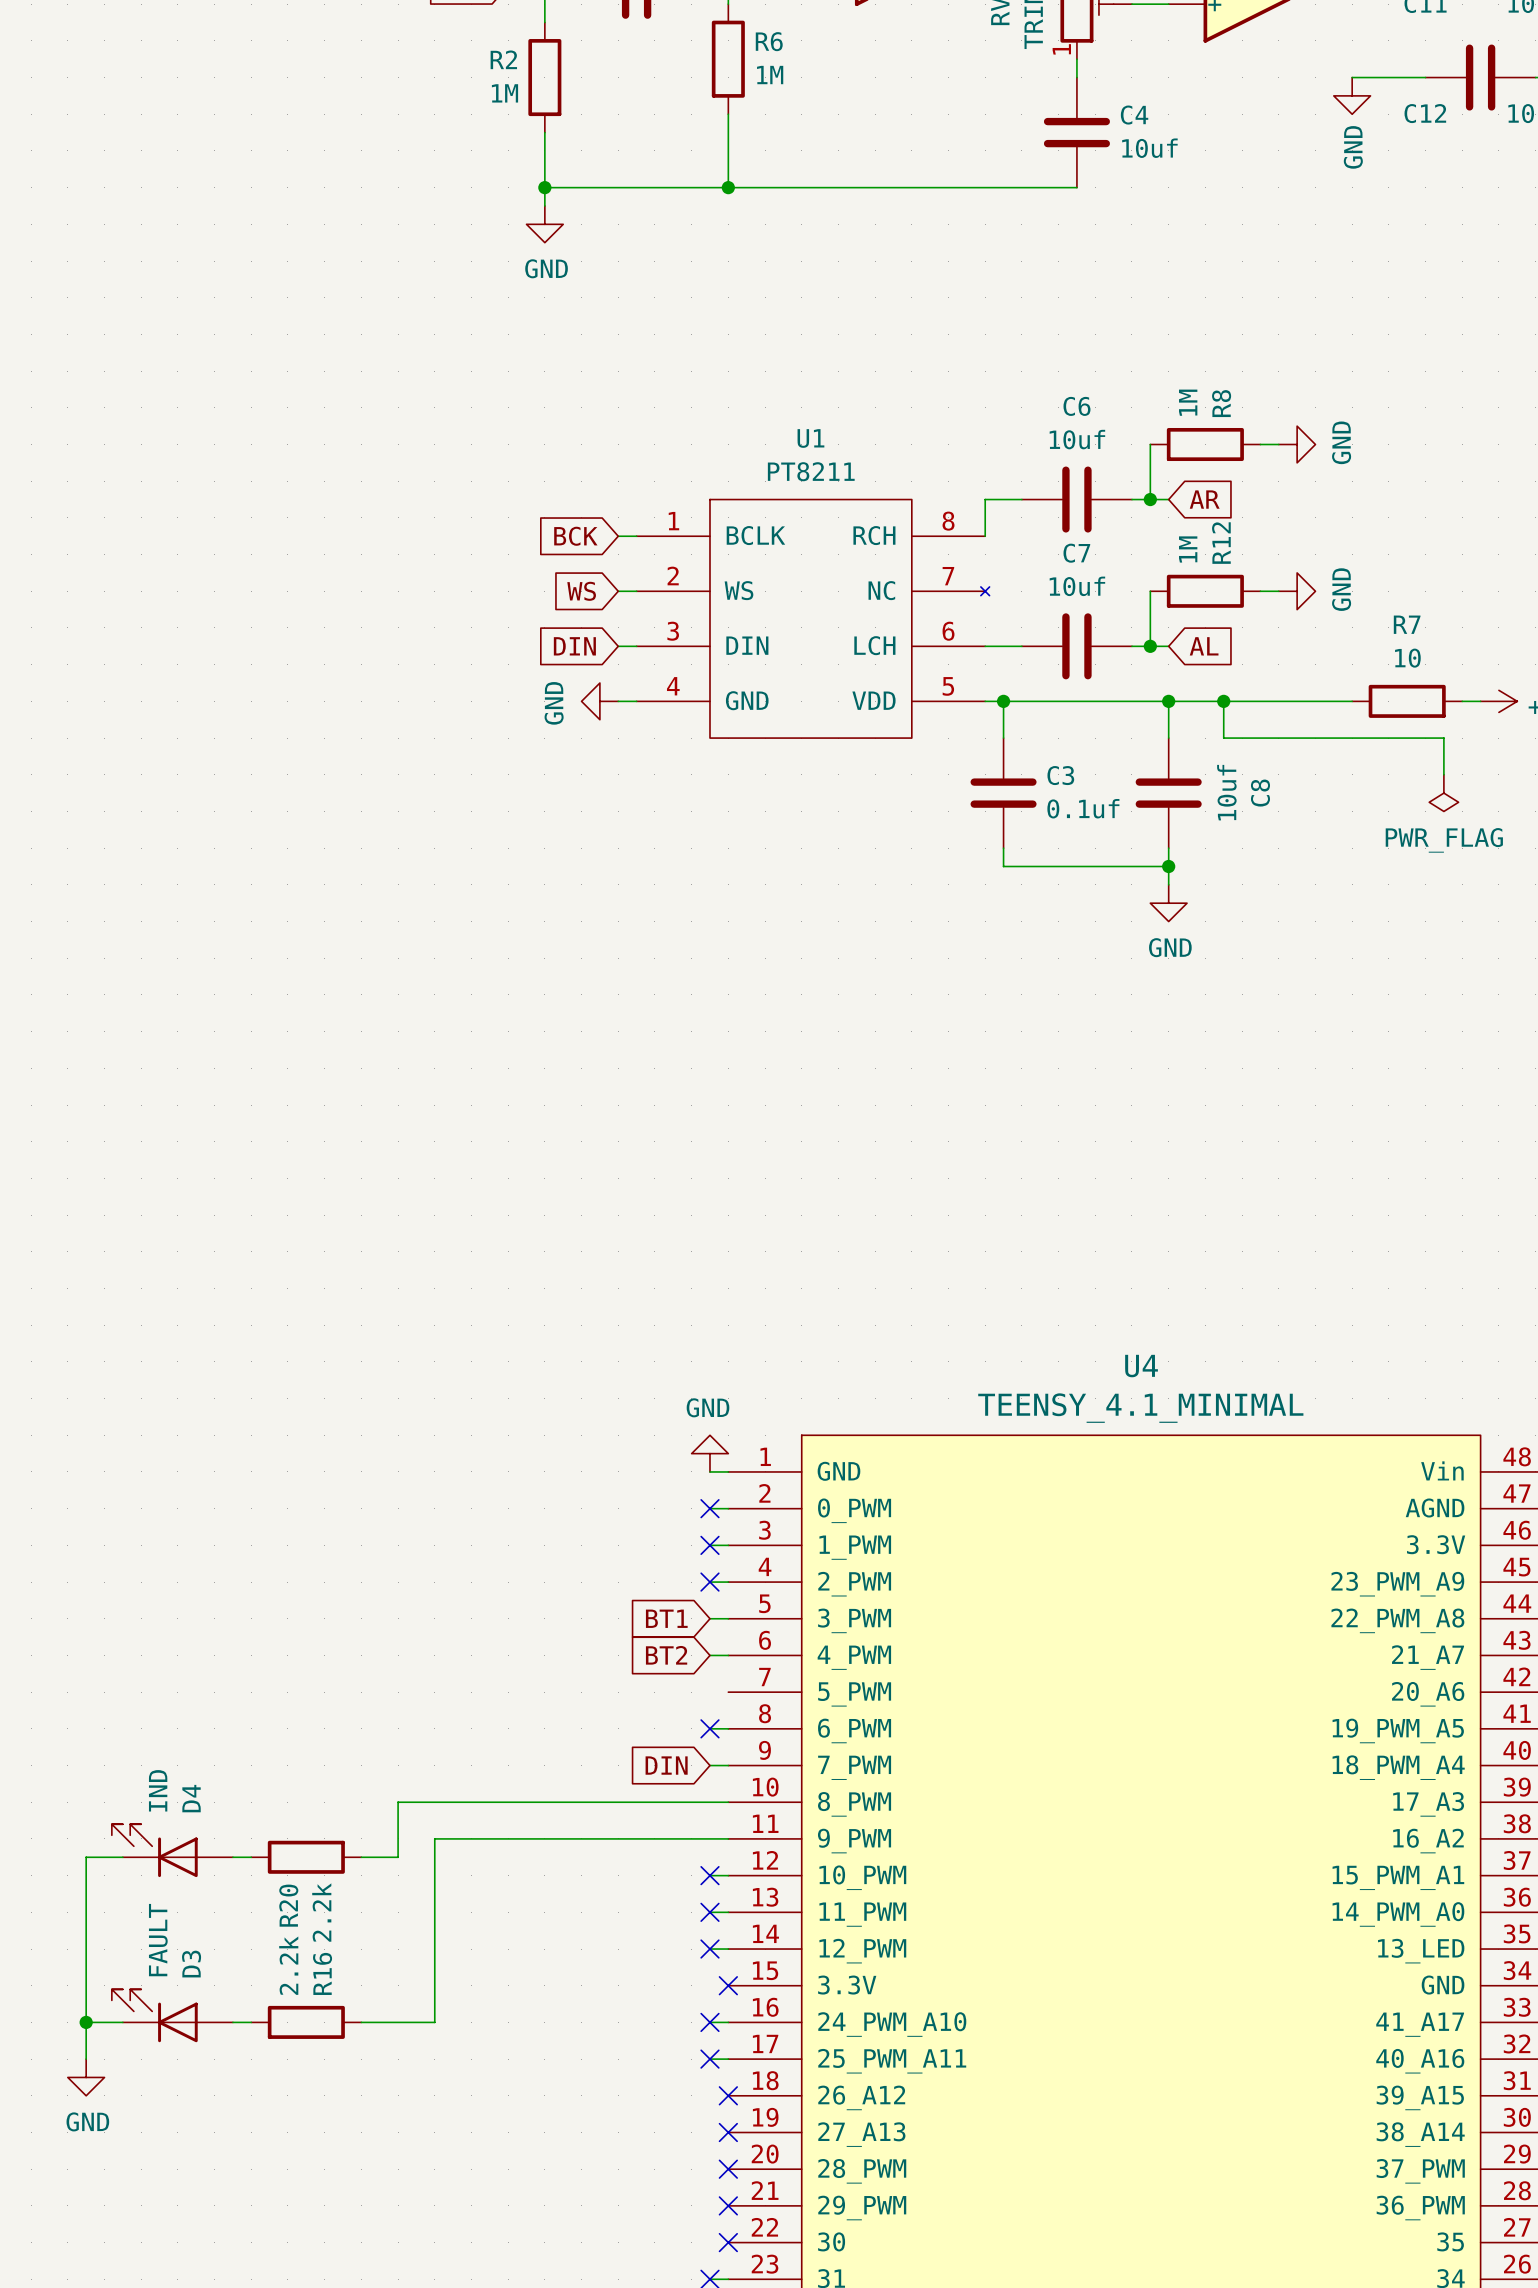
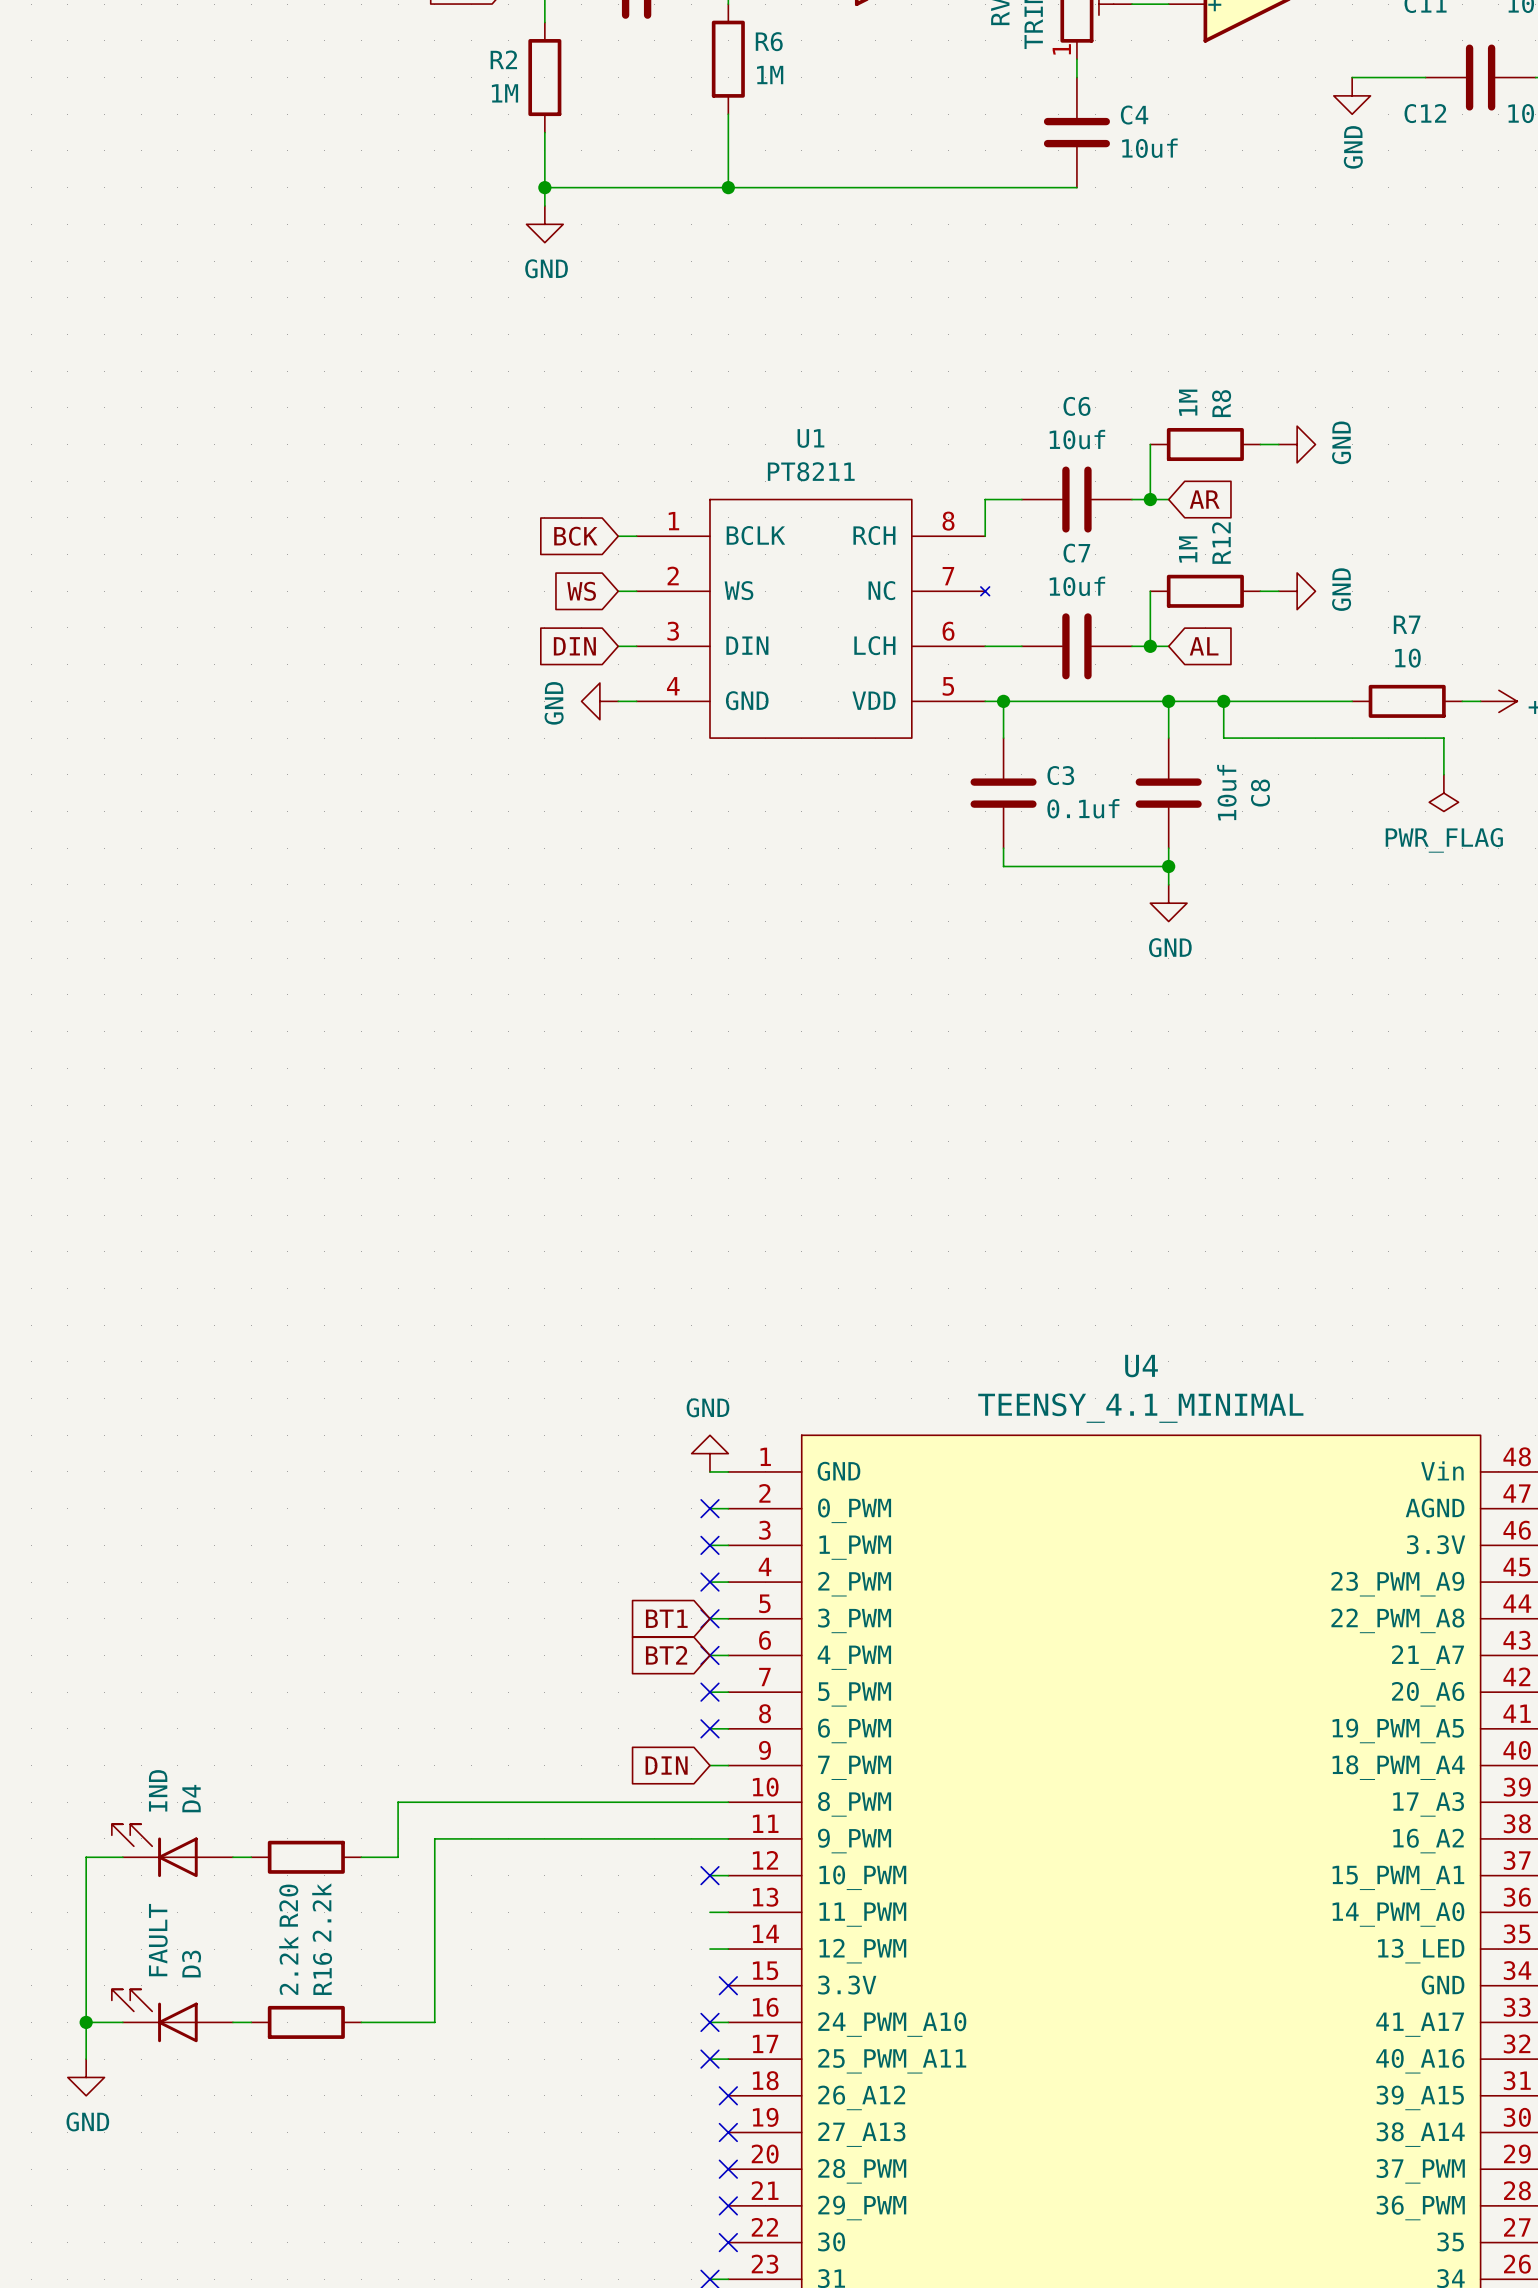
no-connect mark: none -> (709, 1618)
no-connect mark: none -> (709, 1655)
wire: none -> (709, 1692) (728, 1692)
no-connect mark: none -> (709, 1692)
no-connect mark: (709, 1912) -> none
no-connect mark: (709, 1949) -> none

